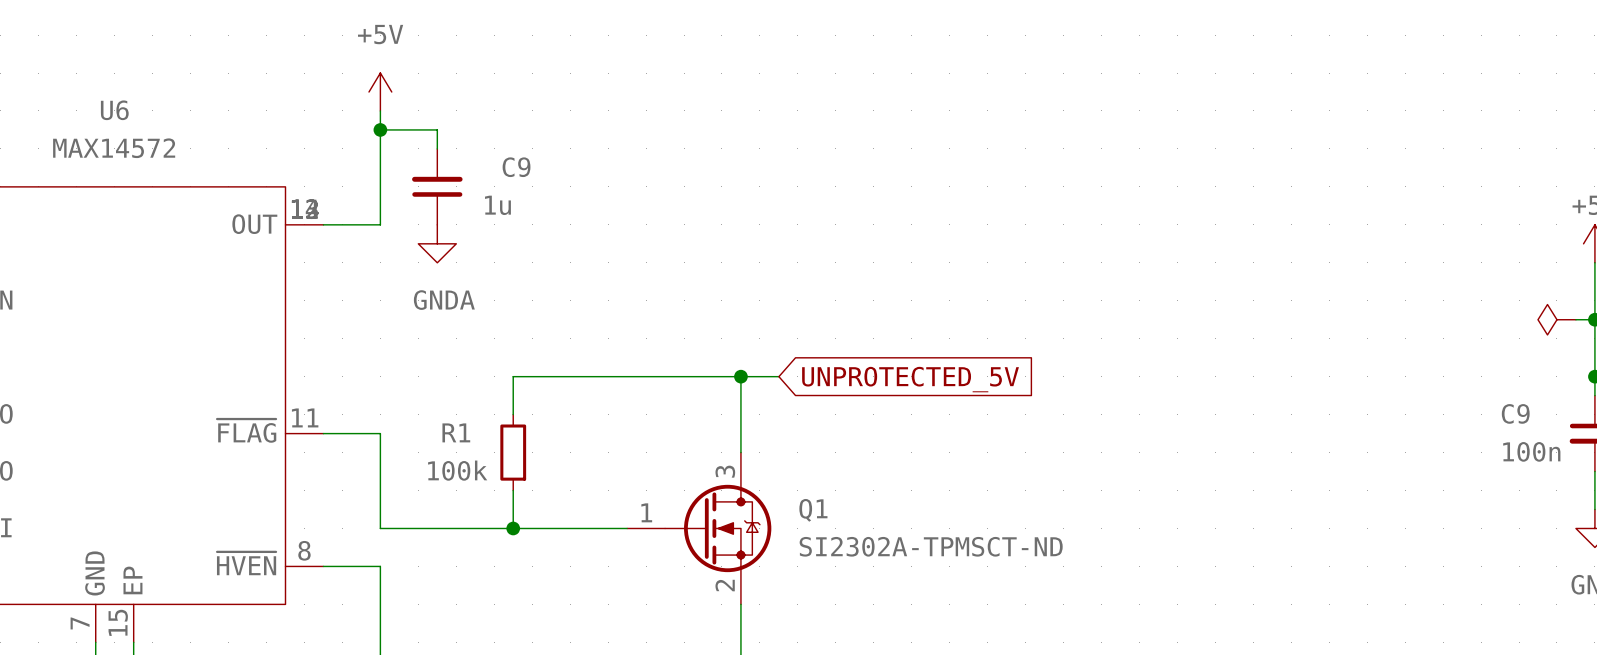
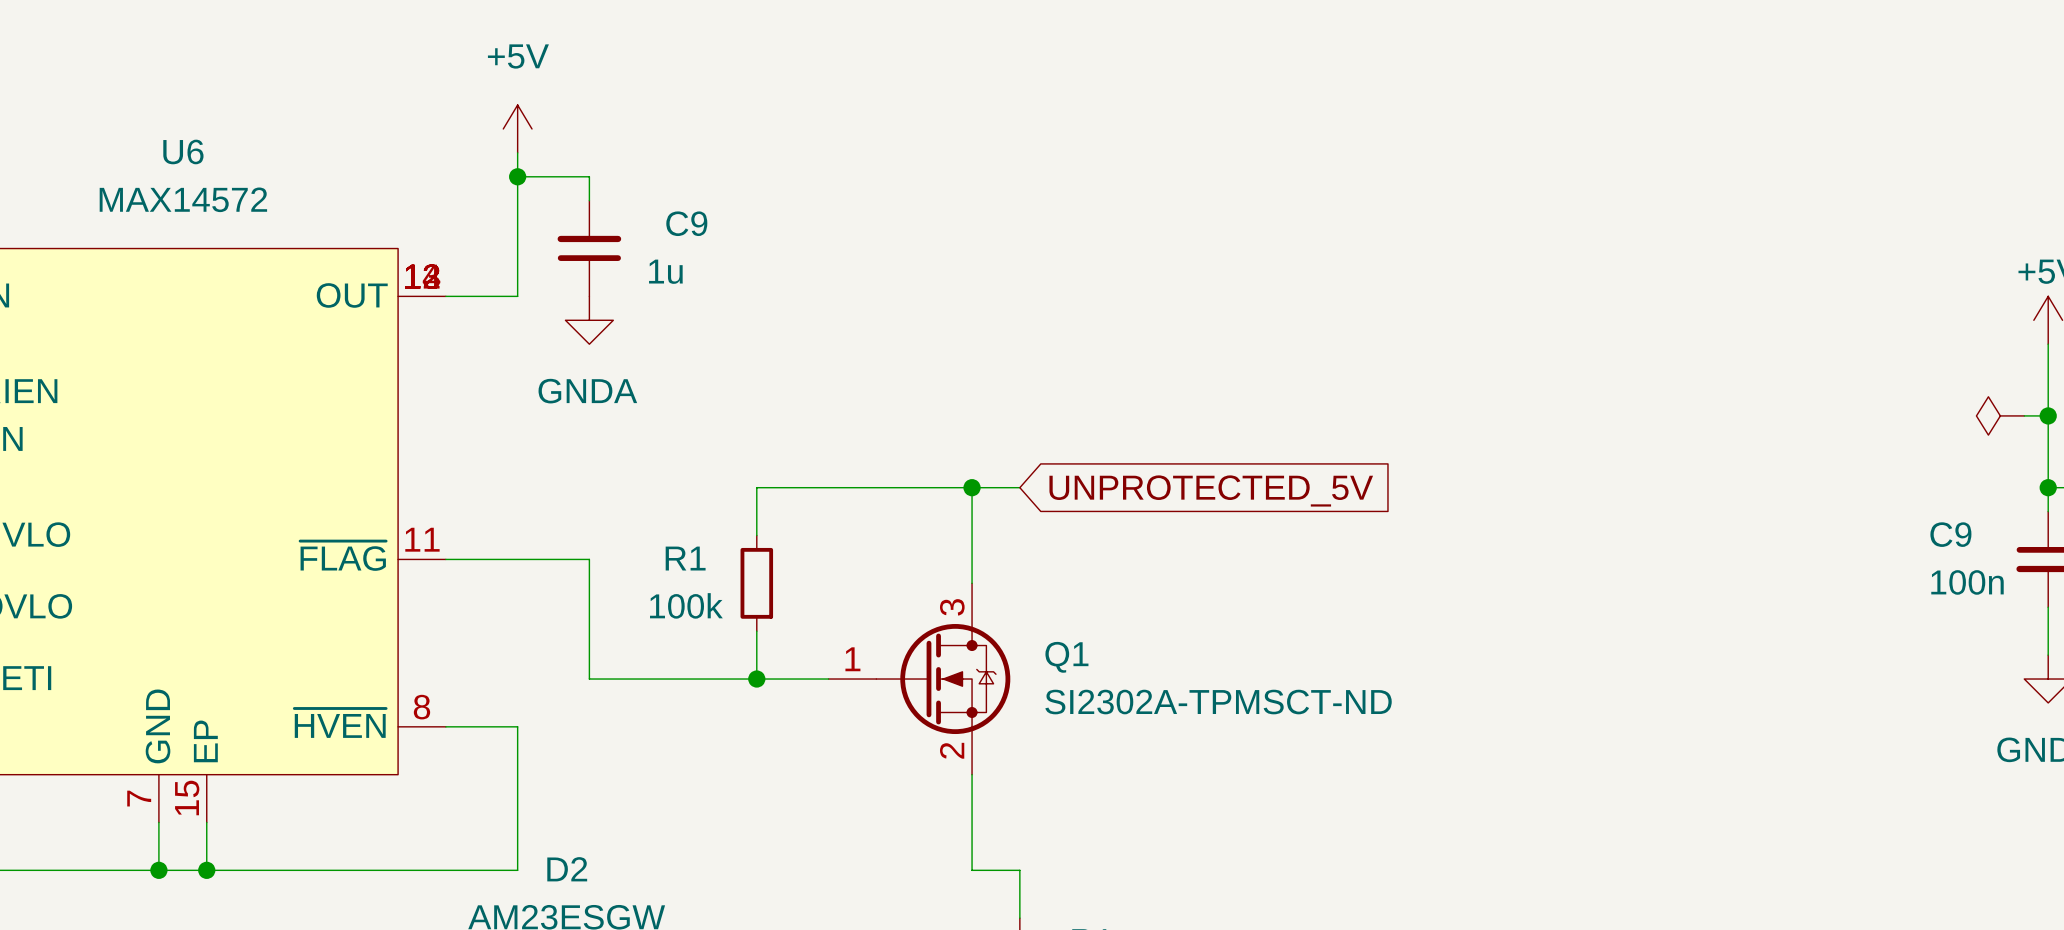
wire: (570, 376) (513, 376) (513, 414) -> (756, 487) (756, 535)
wire: (380, 433) (380, 528) (437, 528) -> (517, 559) (589, 559) (589, 679)
R1 position: (513, 452) -> (756, 583)
wire: (513, 490) (513, 528) -> (756, 631) (756, 679)
junction position: (513, 528) -> (756, 679)

